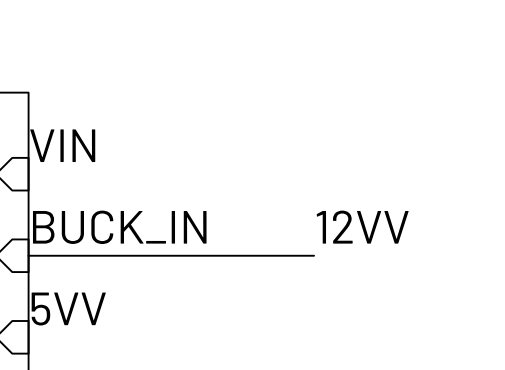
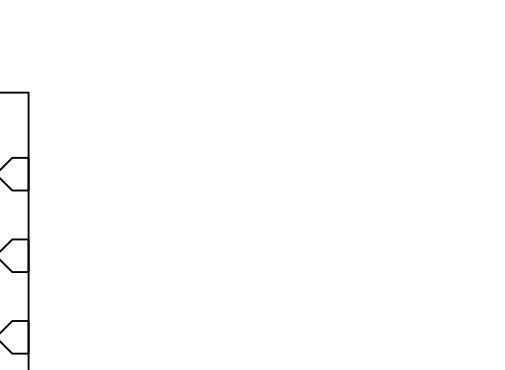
label: VIN (62, 145) -> none
label: BUCK_IN (119, 227) -> none
label: 12VV (362, 227) -> none
wire: (28, 255) (314, 255) -> none
label: 5VV (68, 309) -> none

